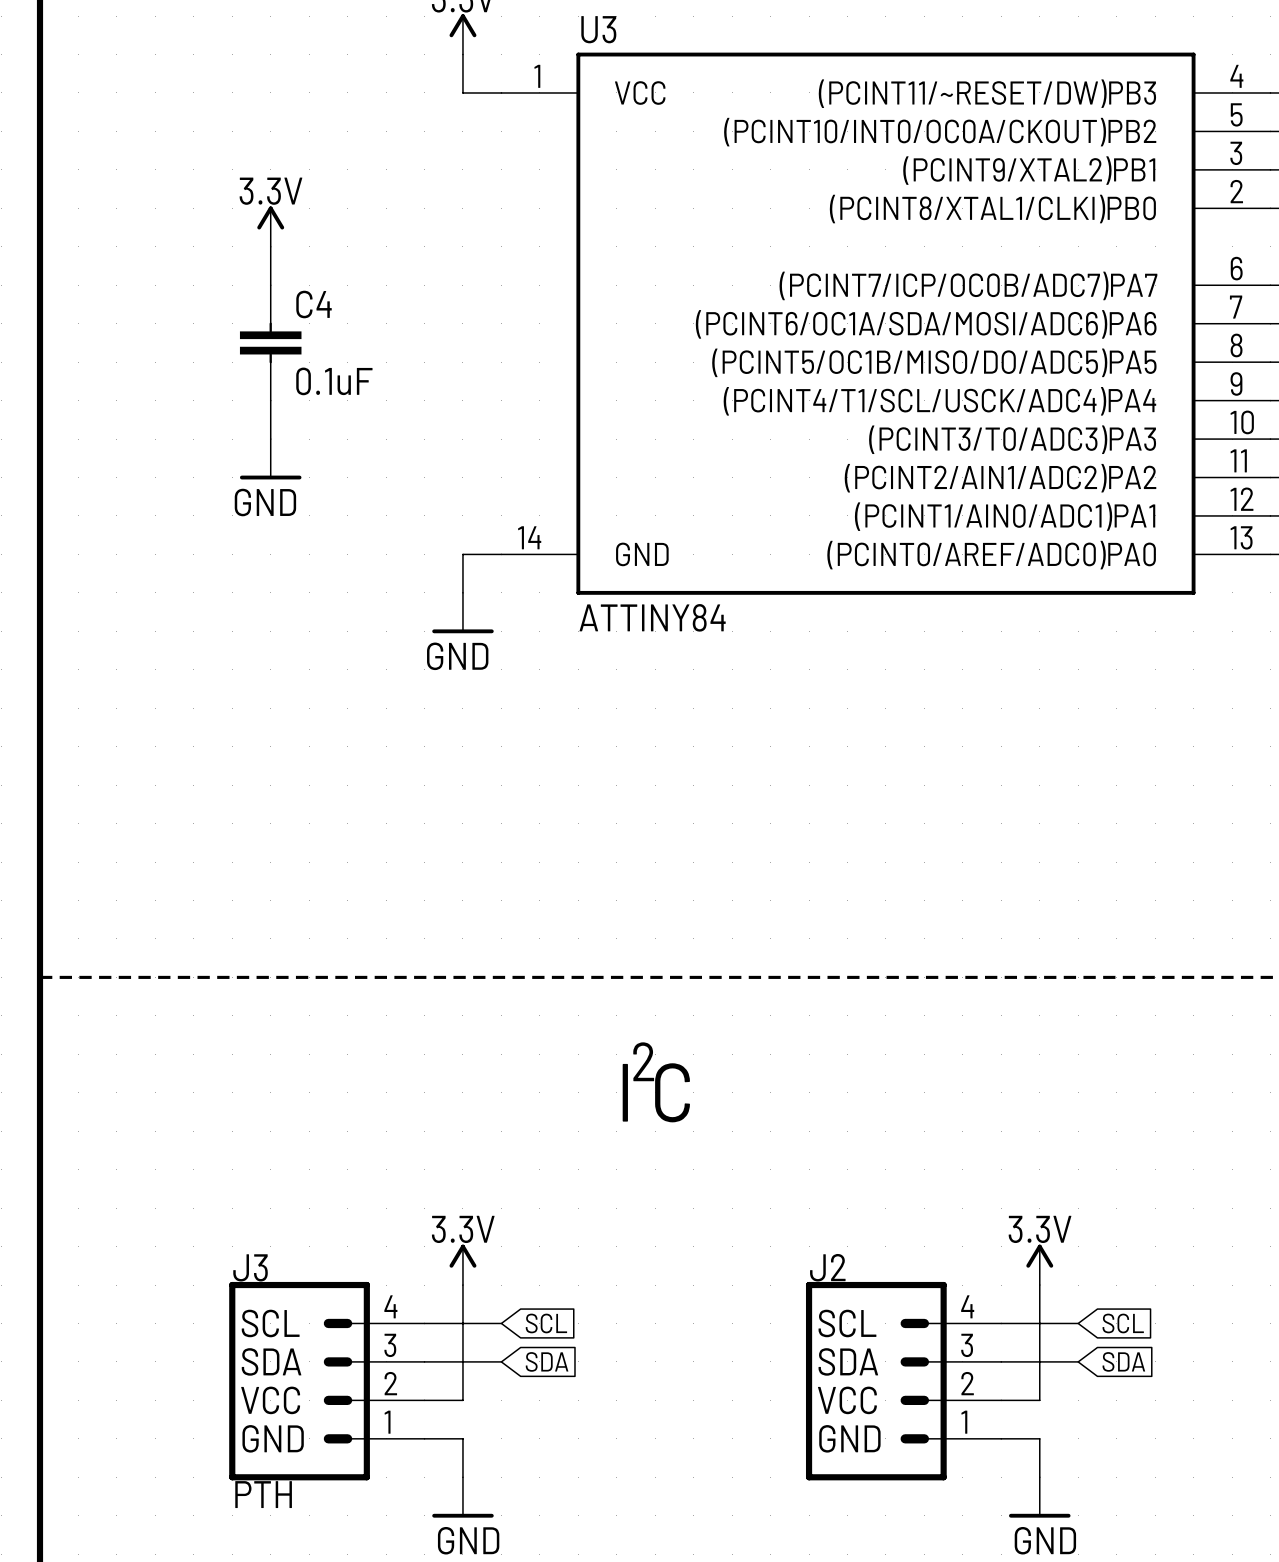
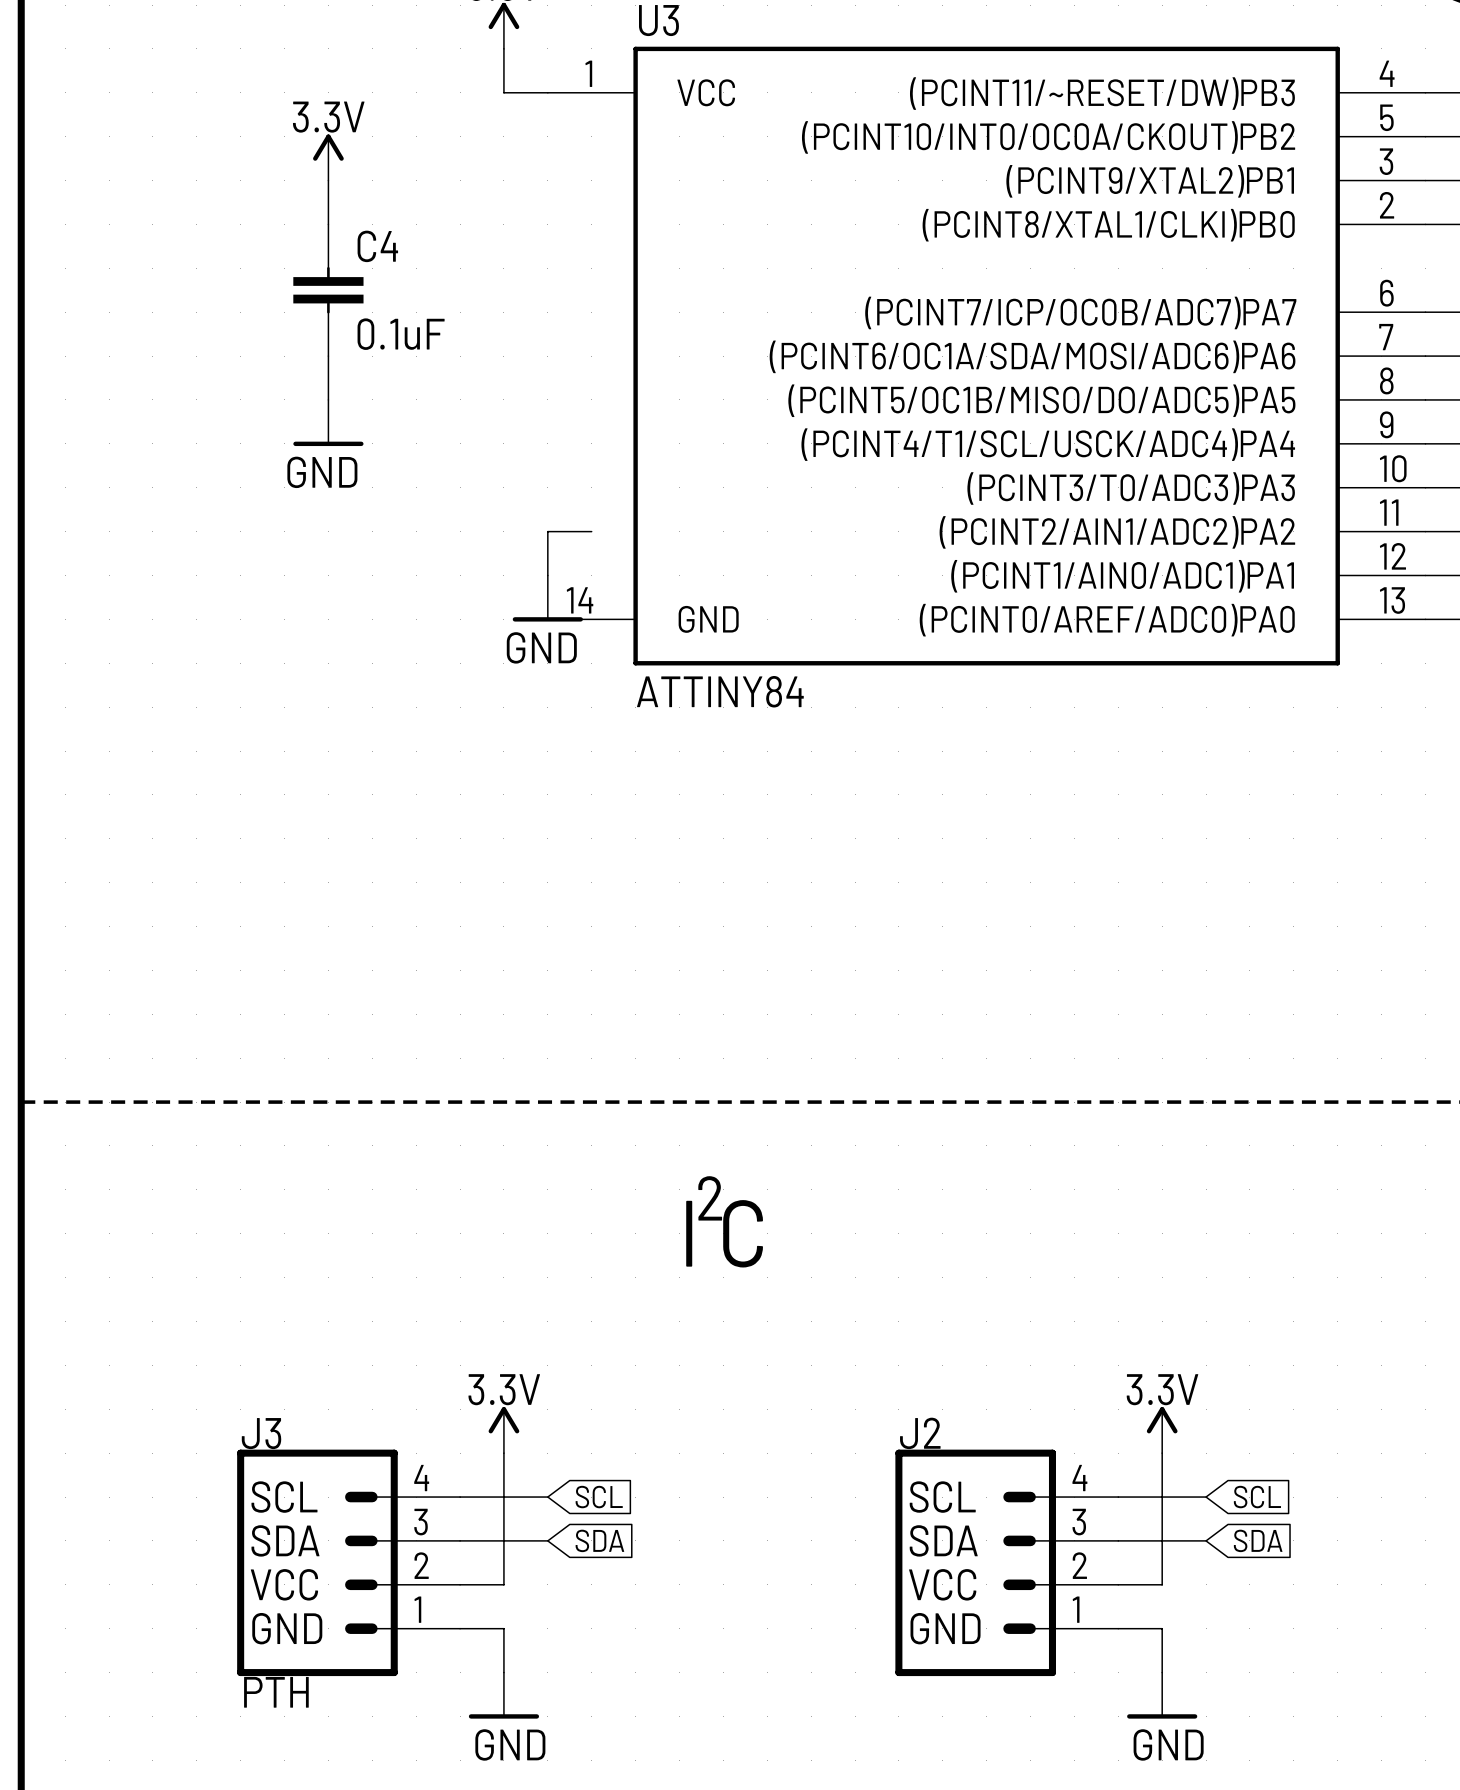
power symbol position: 3.3V (270, 226) -> 3.3V (328, 157)
wire: (270, 246) (270, 285) -> (328, 180) (328, 224)
C4 position: (270, 342) -> (328, 290)
wire: (270, 400) (270, 439) -> (328, 356) (328, 399)
power symbol position: GND (270, 459) -> GND (328, 423)
wire: (501, 554) (462, 554) (462, 592) -> (591, 531) (547, 531) (547, 575)
power symbol position: GND (462, 613) -> GND (547, 598)

